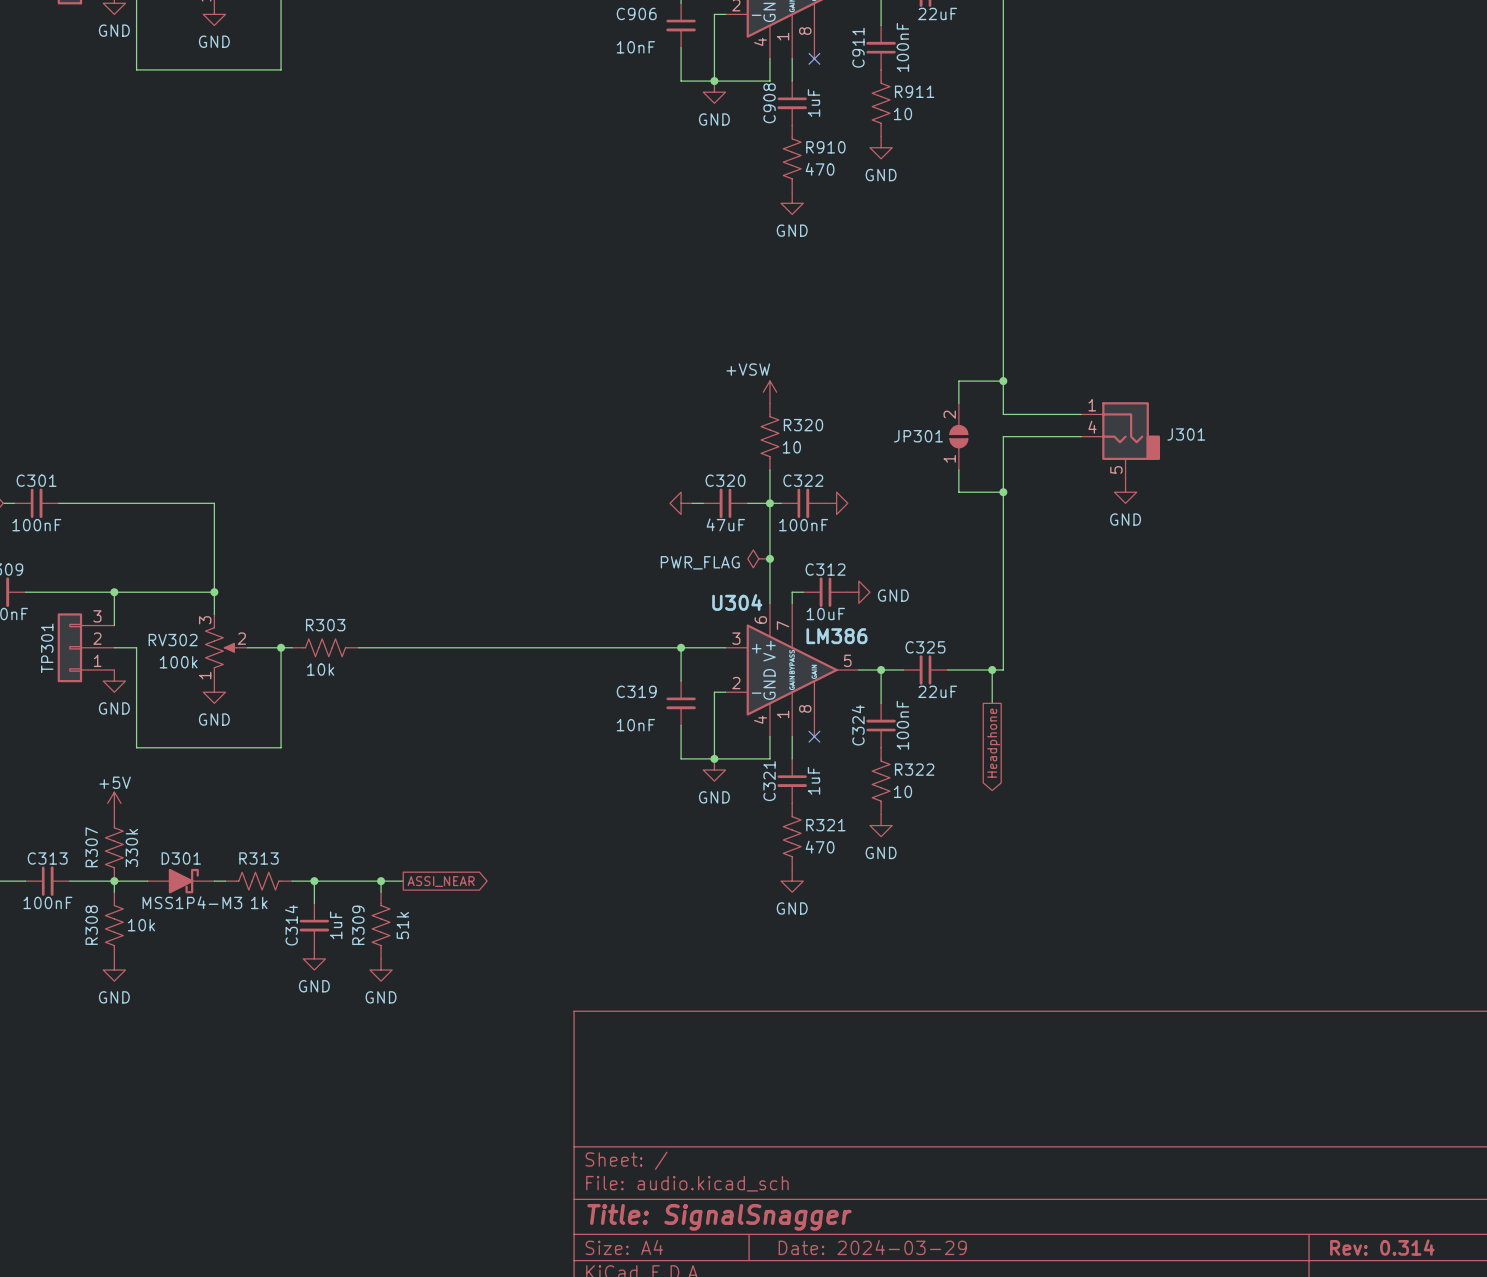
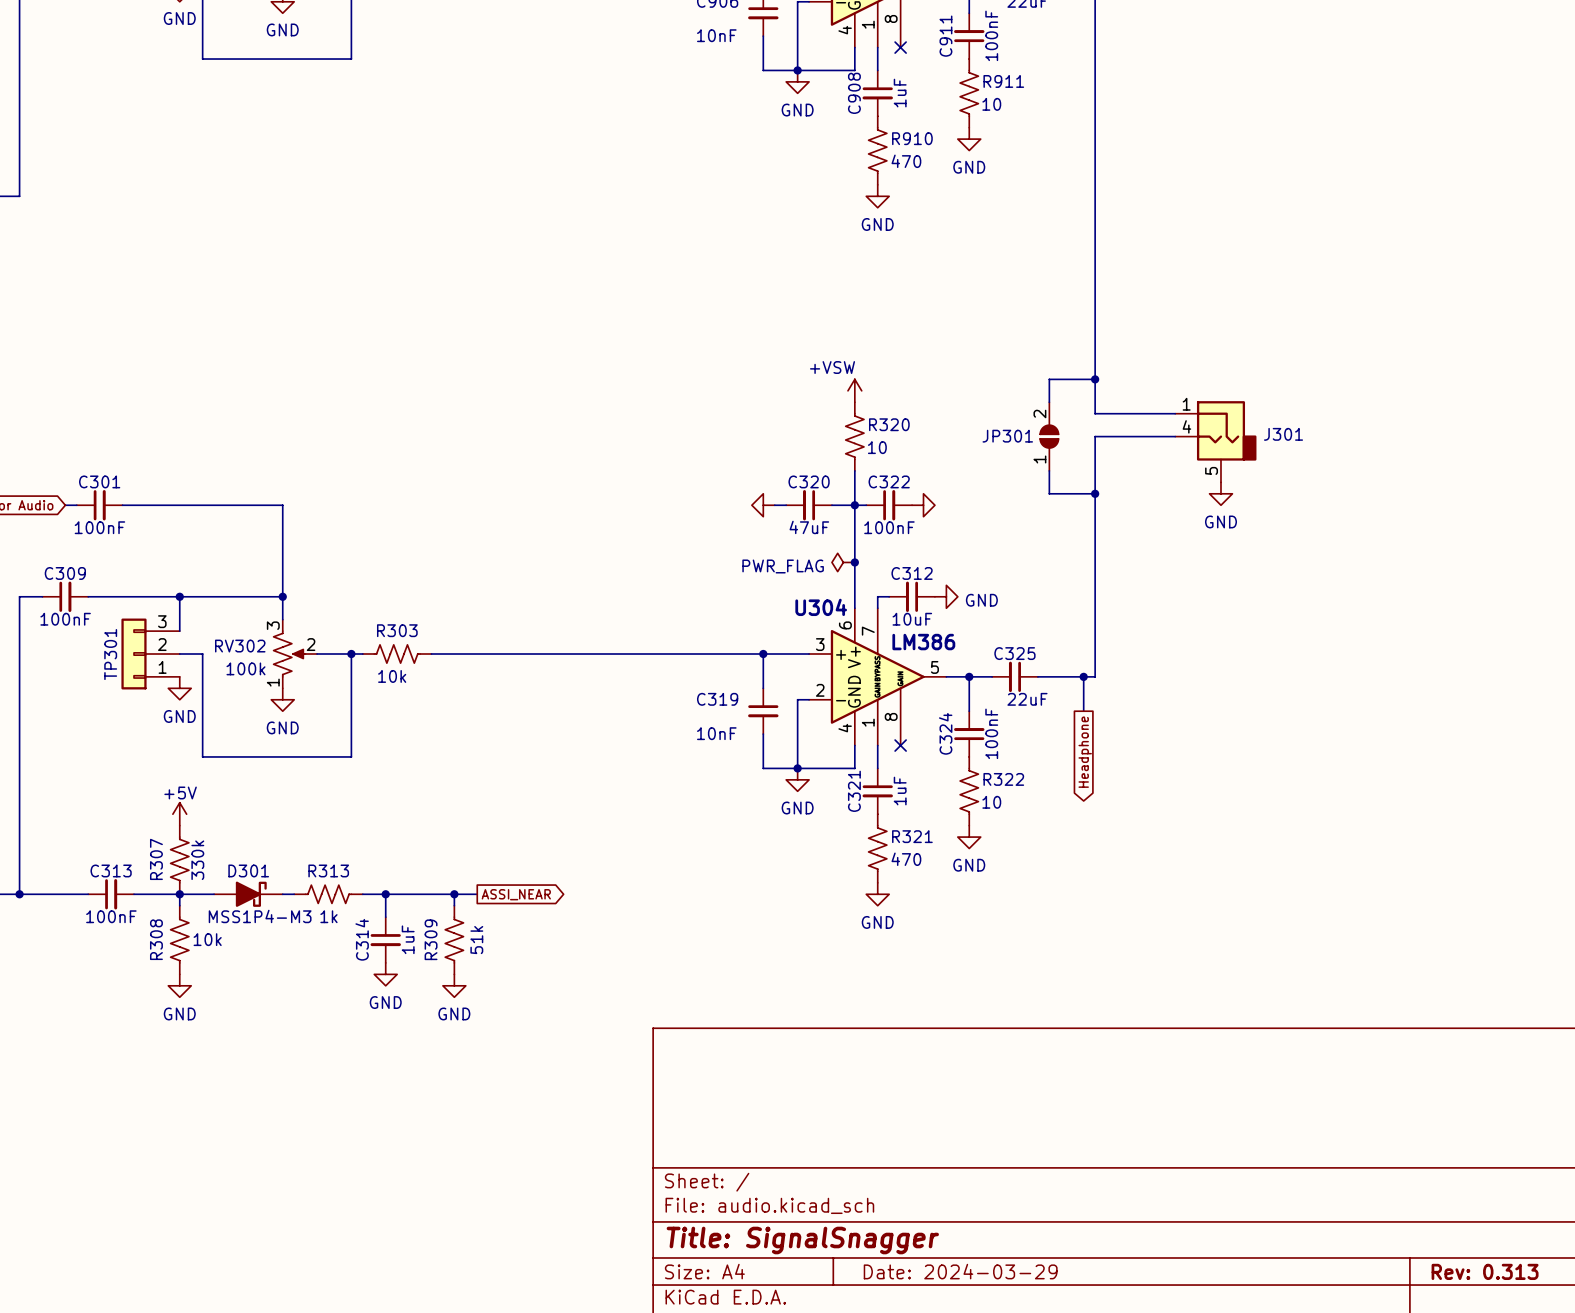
title block: Rev: 0.314 (1382, 1247) -> Rev: 0.313 (1485, 1271)

